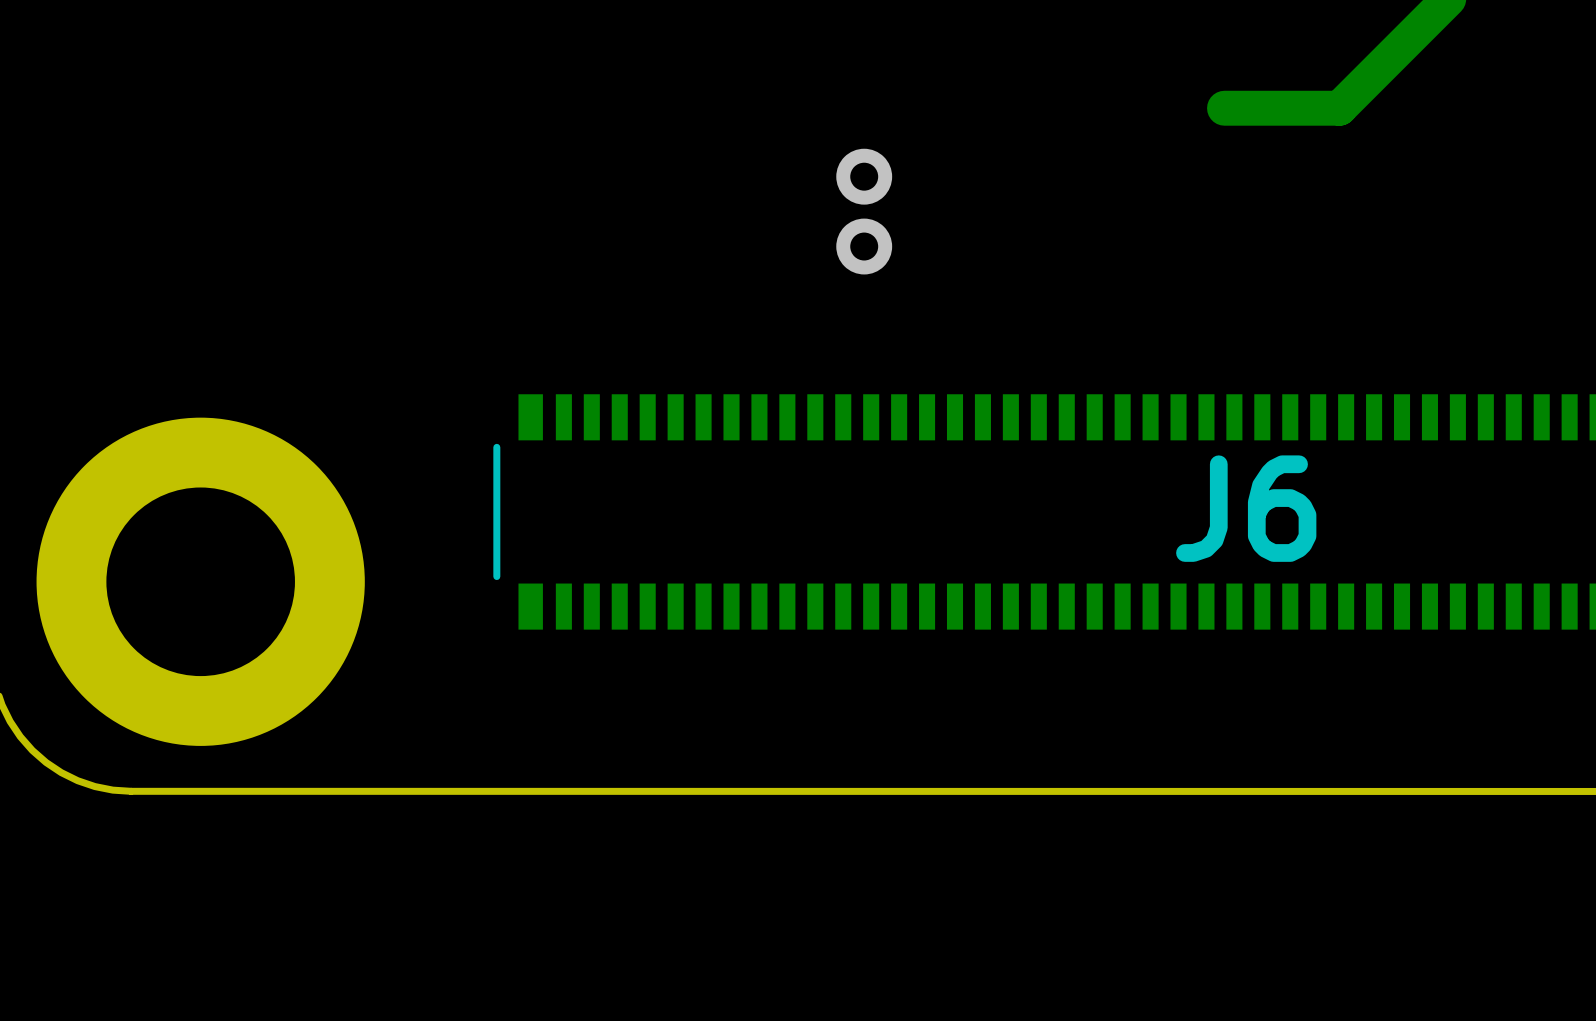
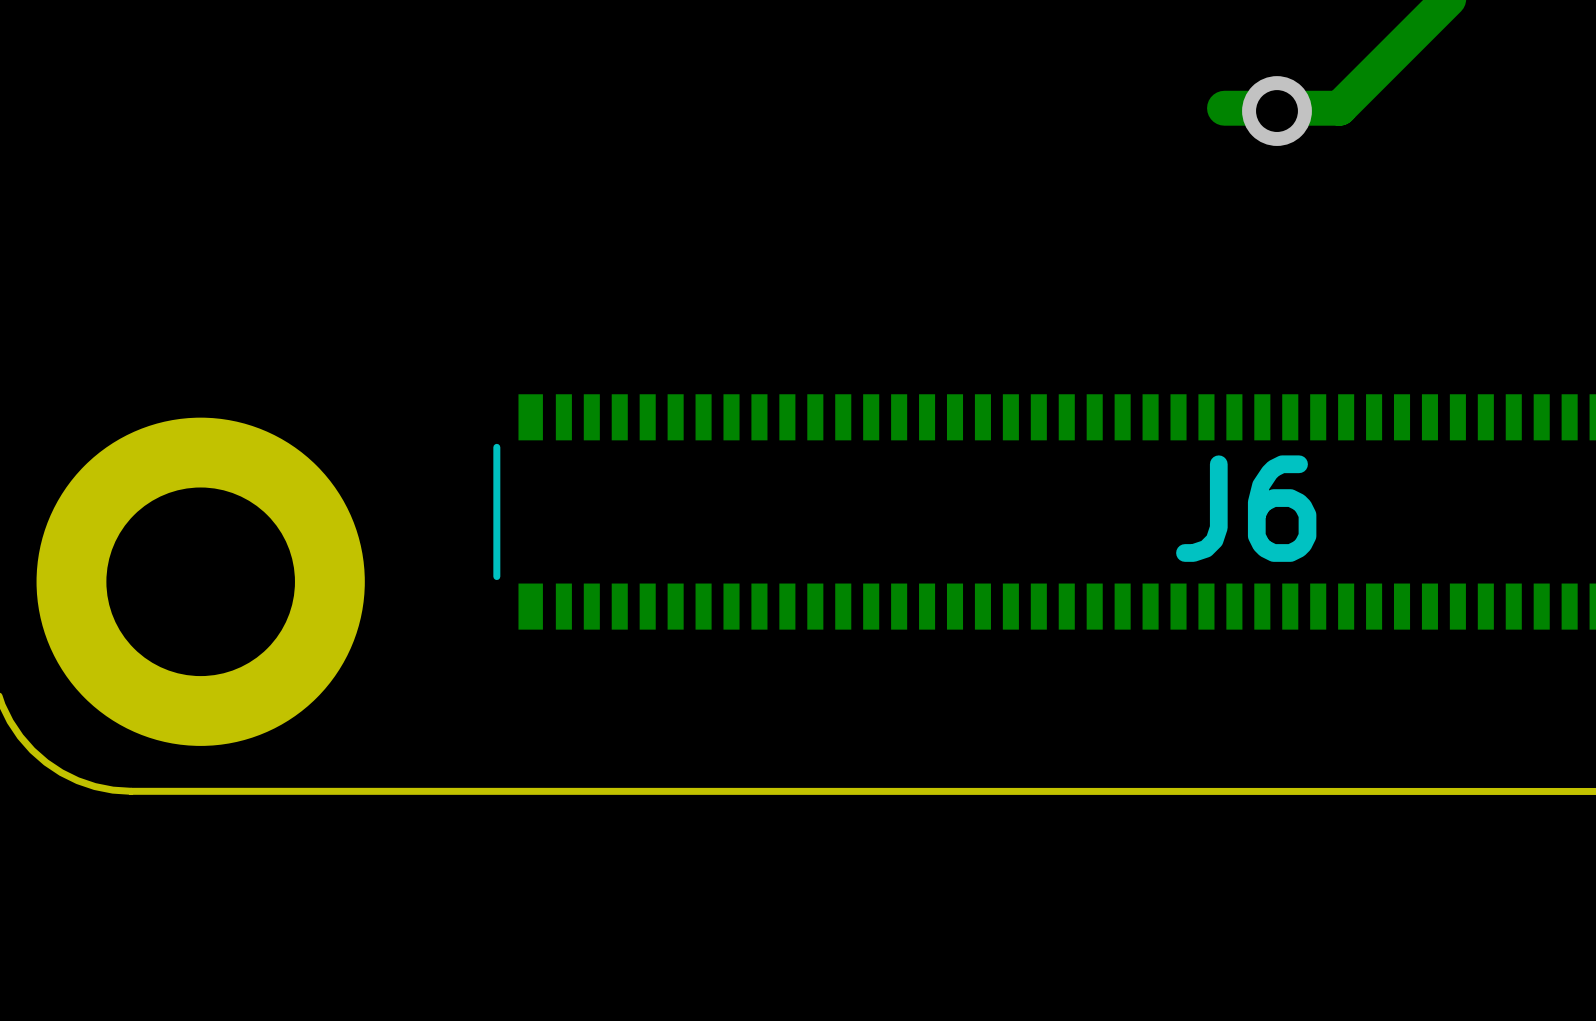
via: none -> (1276, 111)
via: (864, 176) -> none
via: (864, 246) -> none

